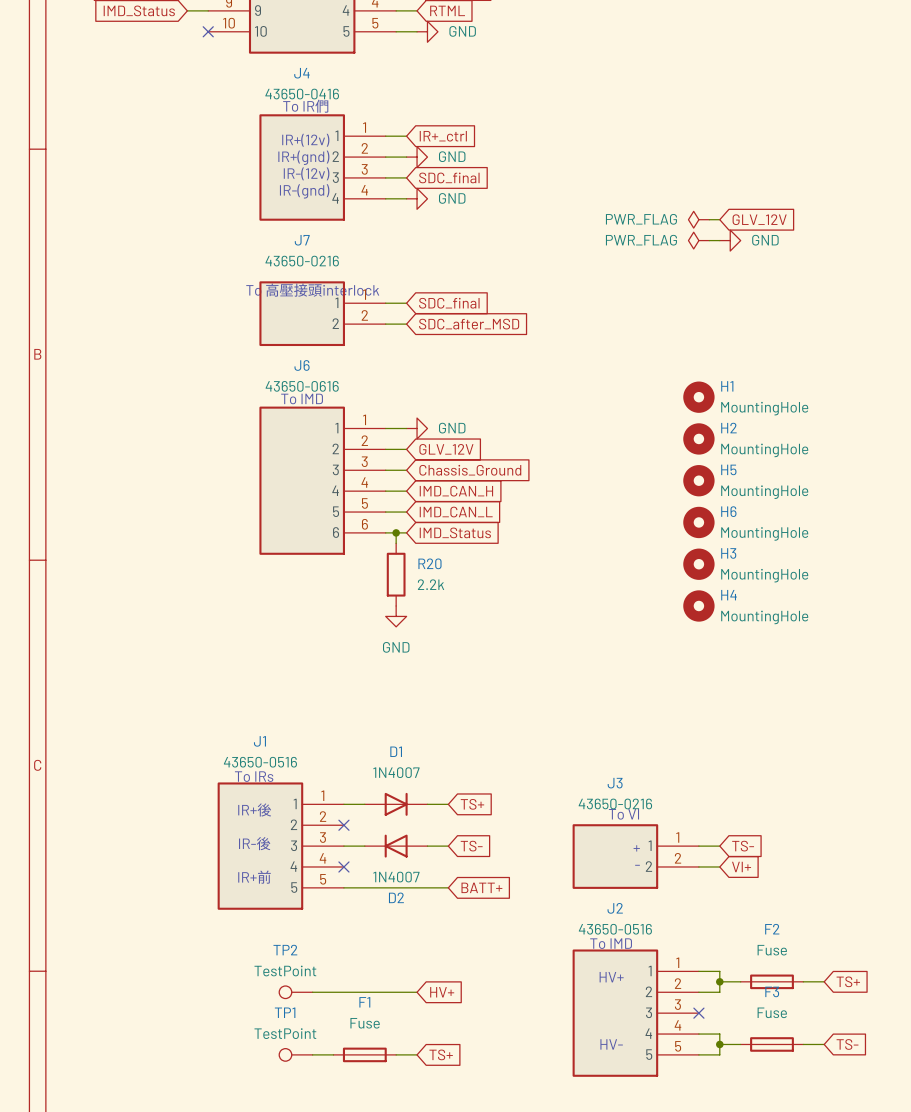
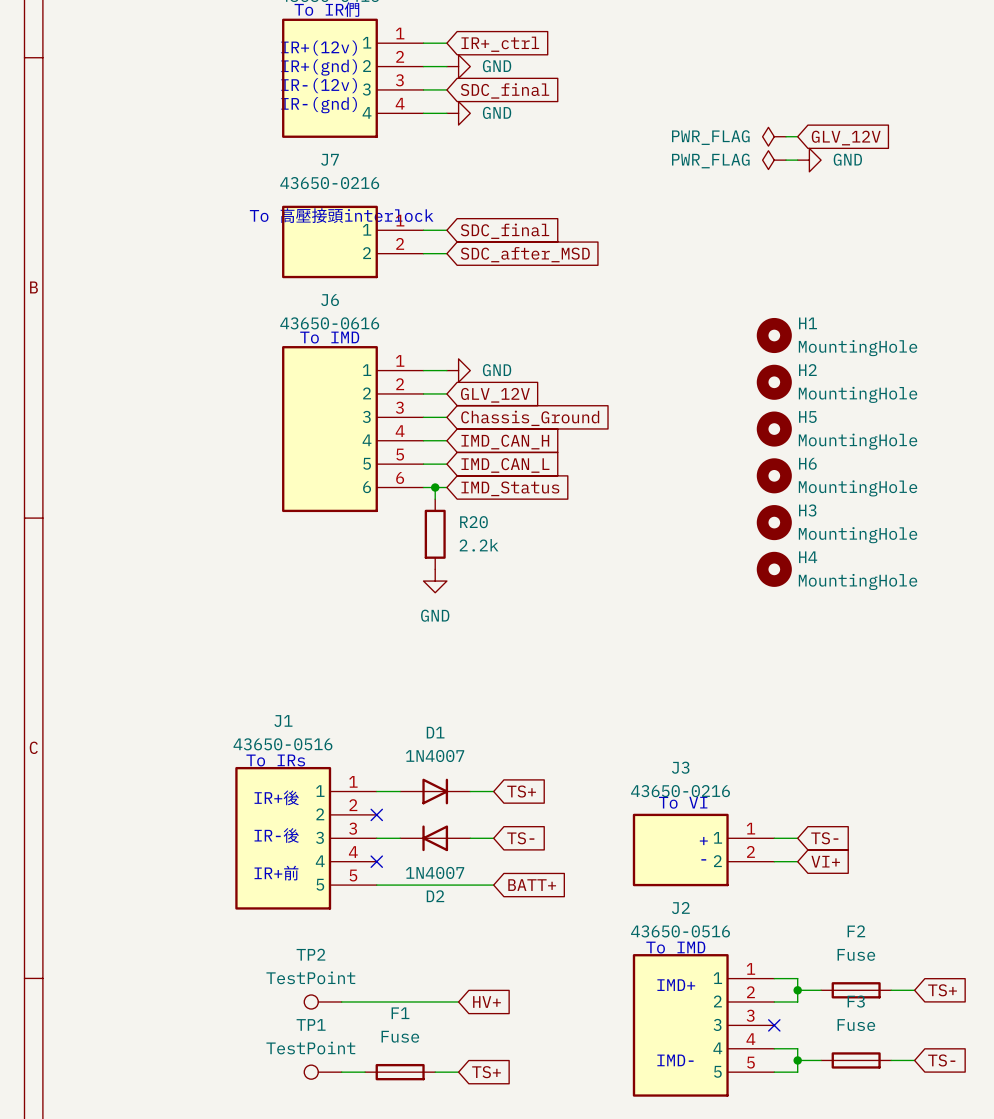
text: HV+ (611, 977) -> IMD+ (676, 985)
text: HV- (611, 1044) -> IMD- (675, 1060)

